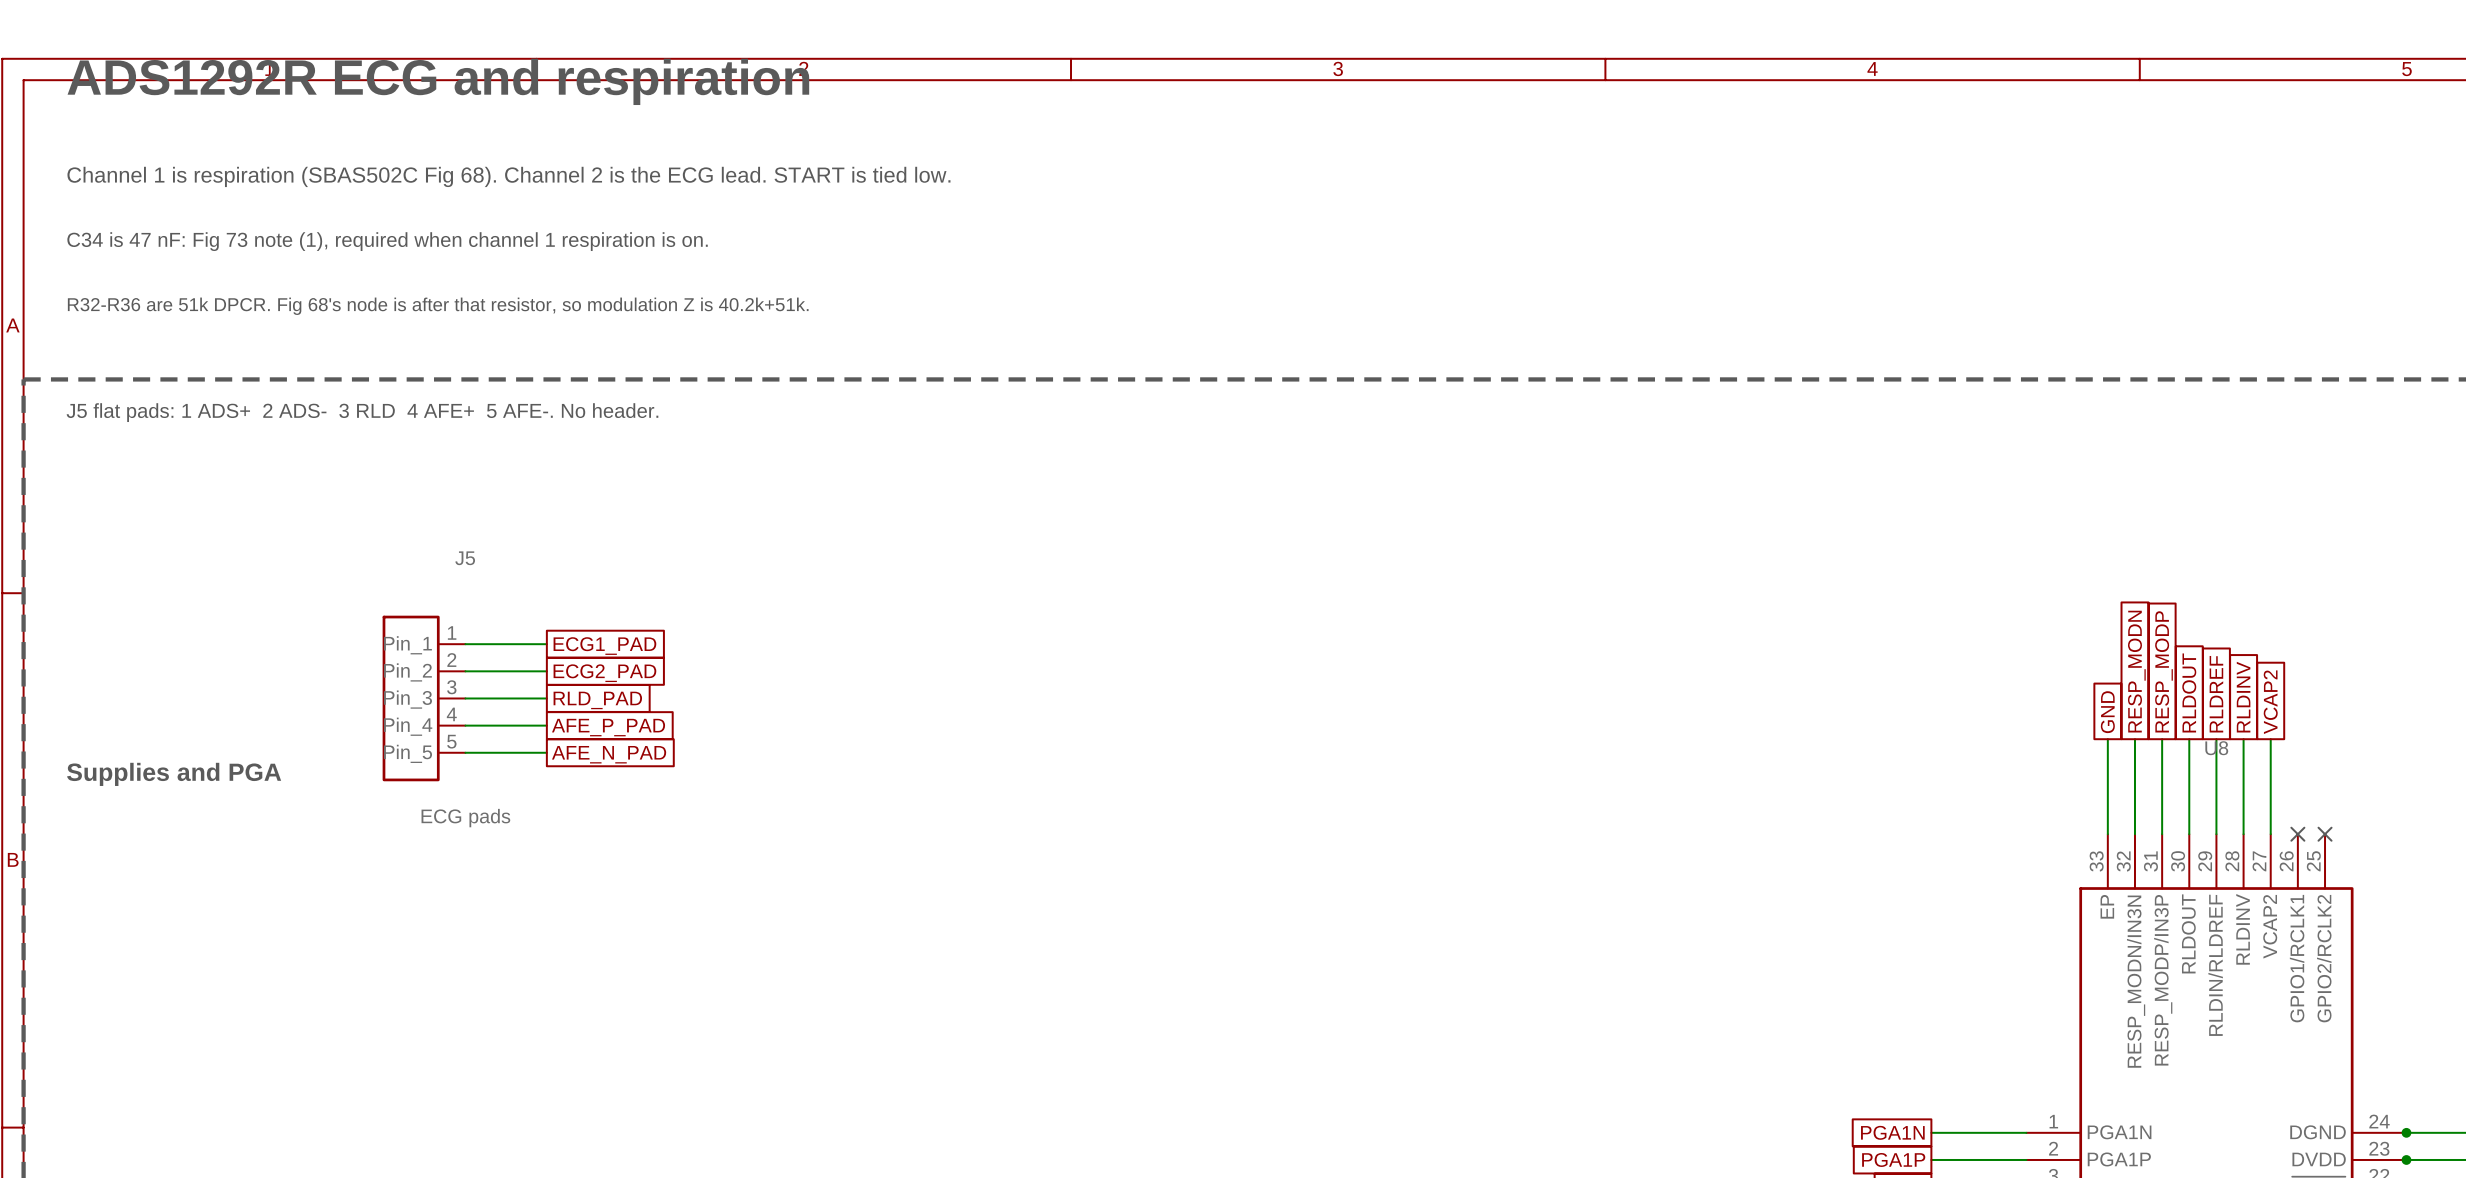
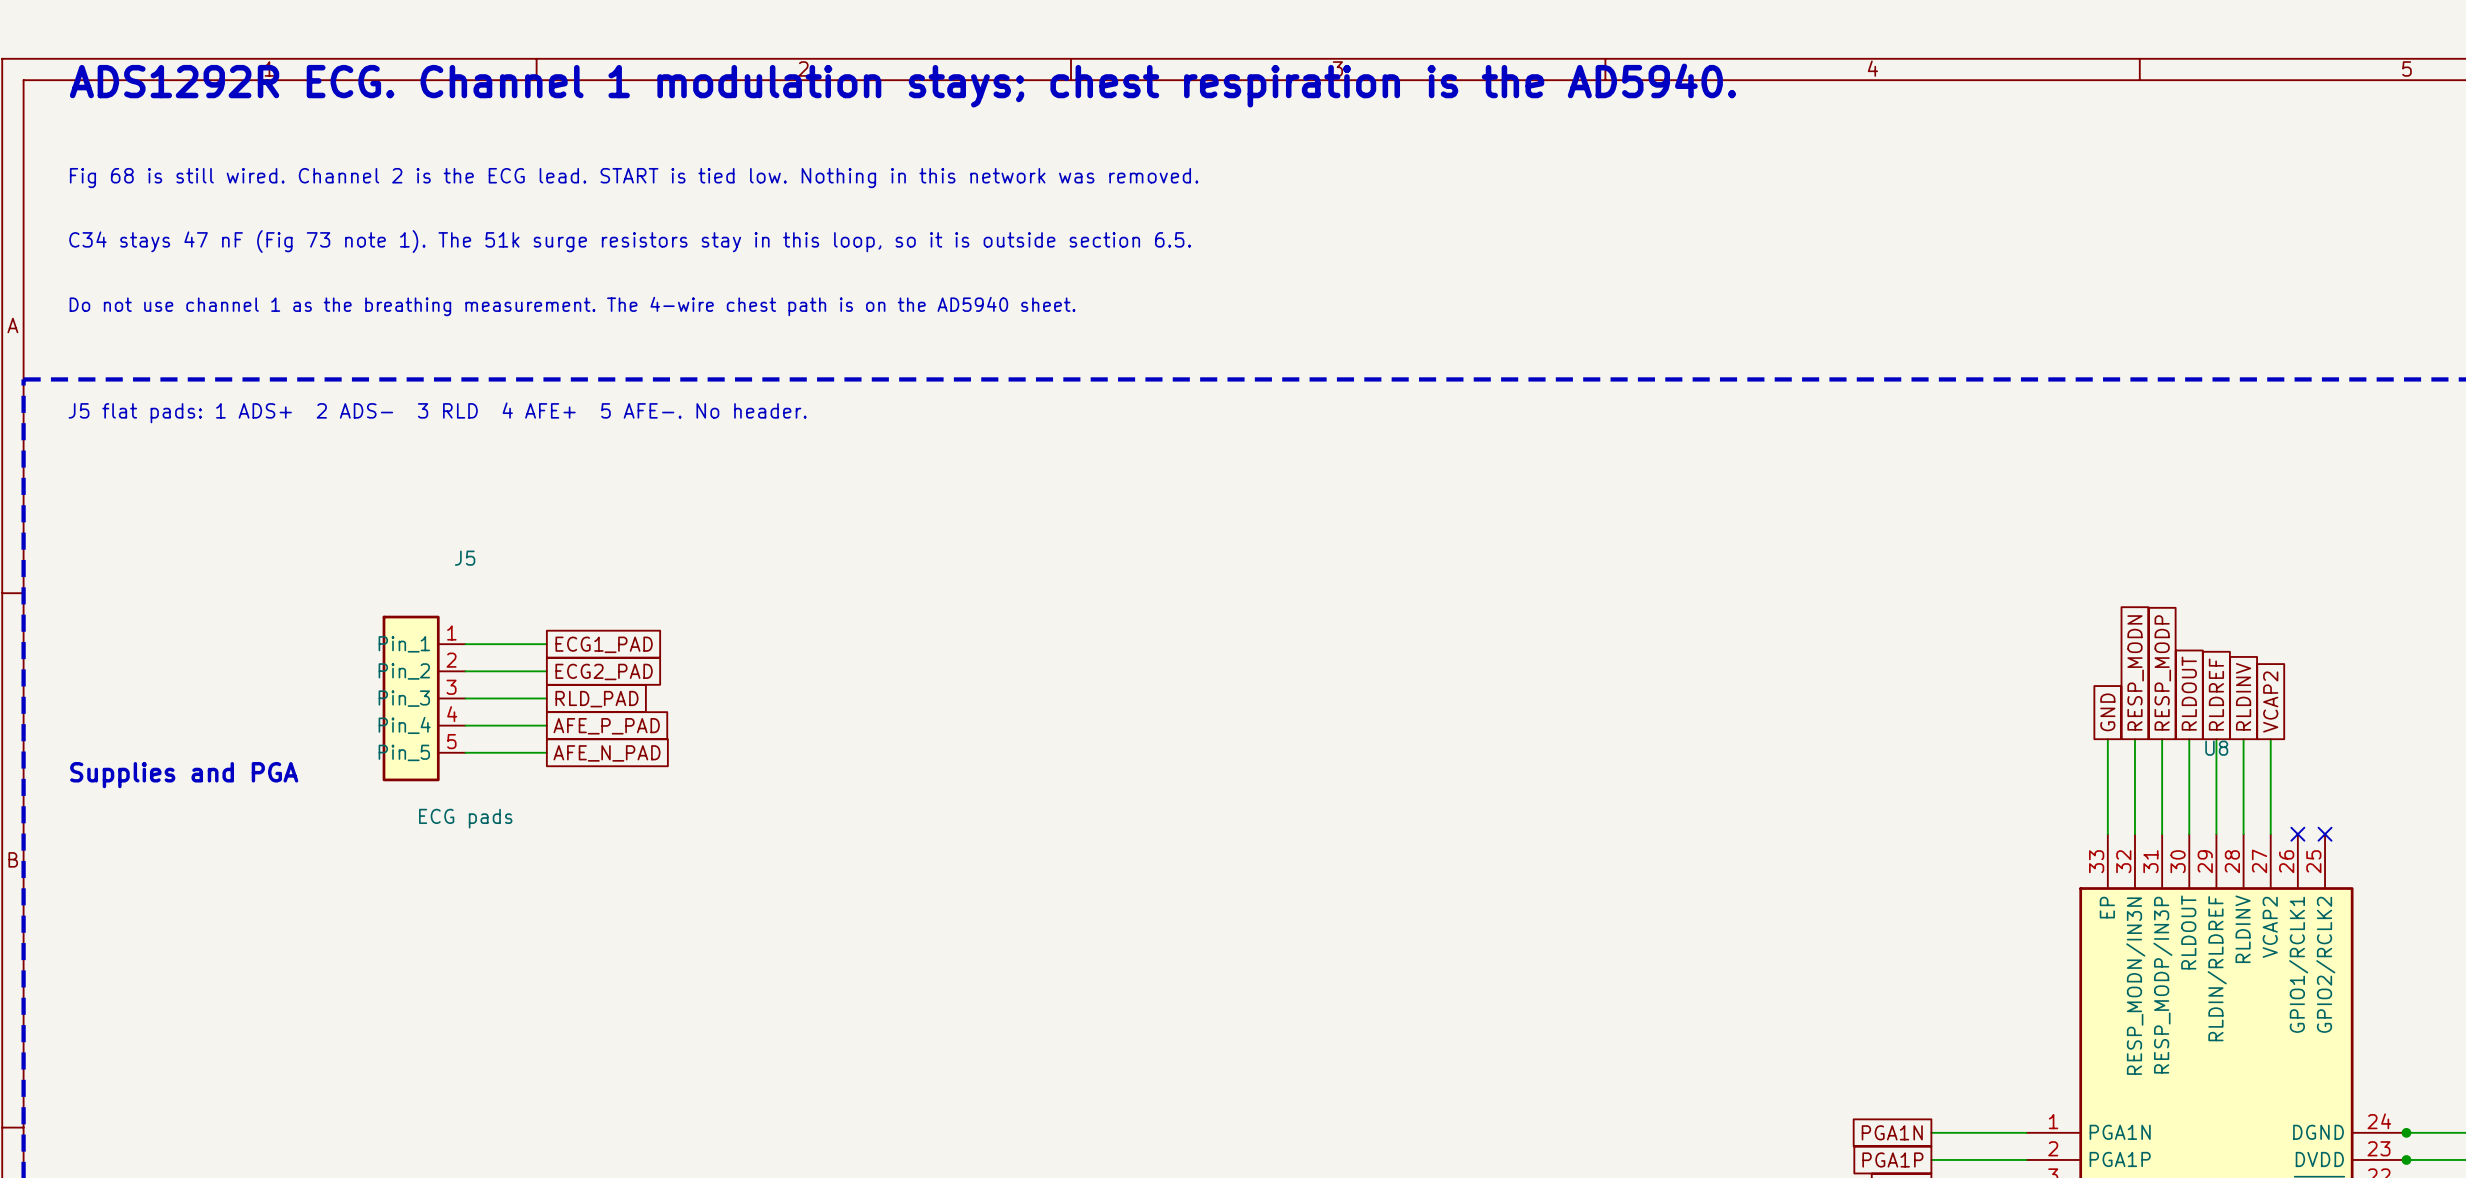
text: ADS1292R ECG and respiration (438, 81) -> ADS1292R ECG. Channel 1 modulation stays; chest respiration is the AD5940. (902, 85)
text: Channel 1 is respiration (SBAS502C Fig 68). Channel 2 is the ECG lead. START is tied low. (508, 176) -> Fig 68 is still wired. Channel 2 is the ECG lead. START is tied low. Nothing in this network was removed. (634, 178)
text: C34 is 47 nF: Fig 73 note (1), required when channel 1 respiration is on. (387, 241) -> C34 stays 47 nF (Fig 73 note 1). The 51k surge resistors stay in this loop, so it is outside section 6.5. (630, 241)
text: R32-R36 are 51k DPCR. Fig 68's node is after that resistor, so modulation Z is 40.2k+51k. (438, 306) -> Do not use channel 1 as the breathing measurement. The 4-wire chest path is on the AD5940 sheet. (572, 306)

